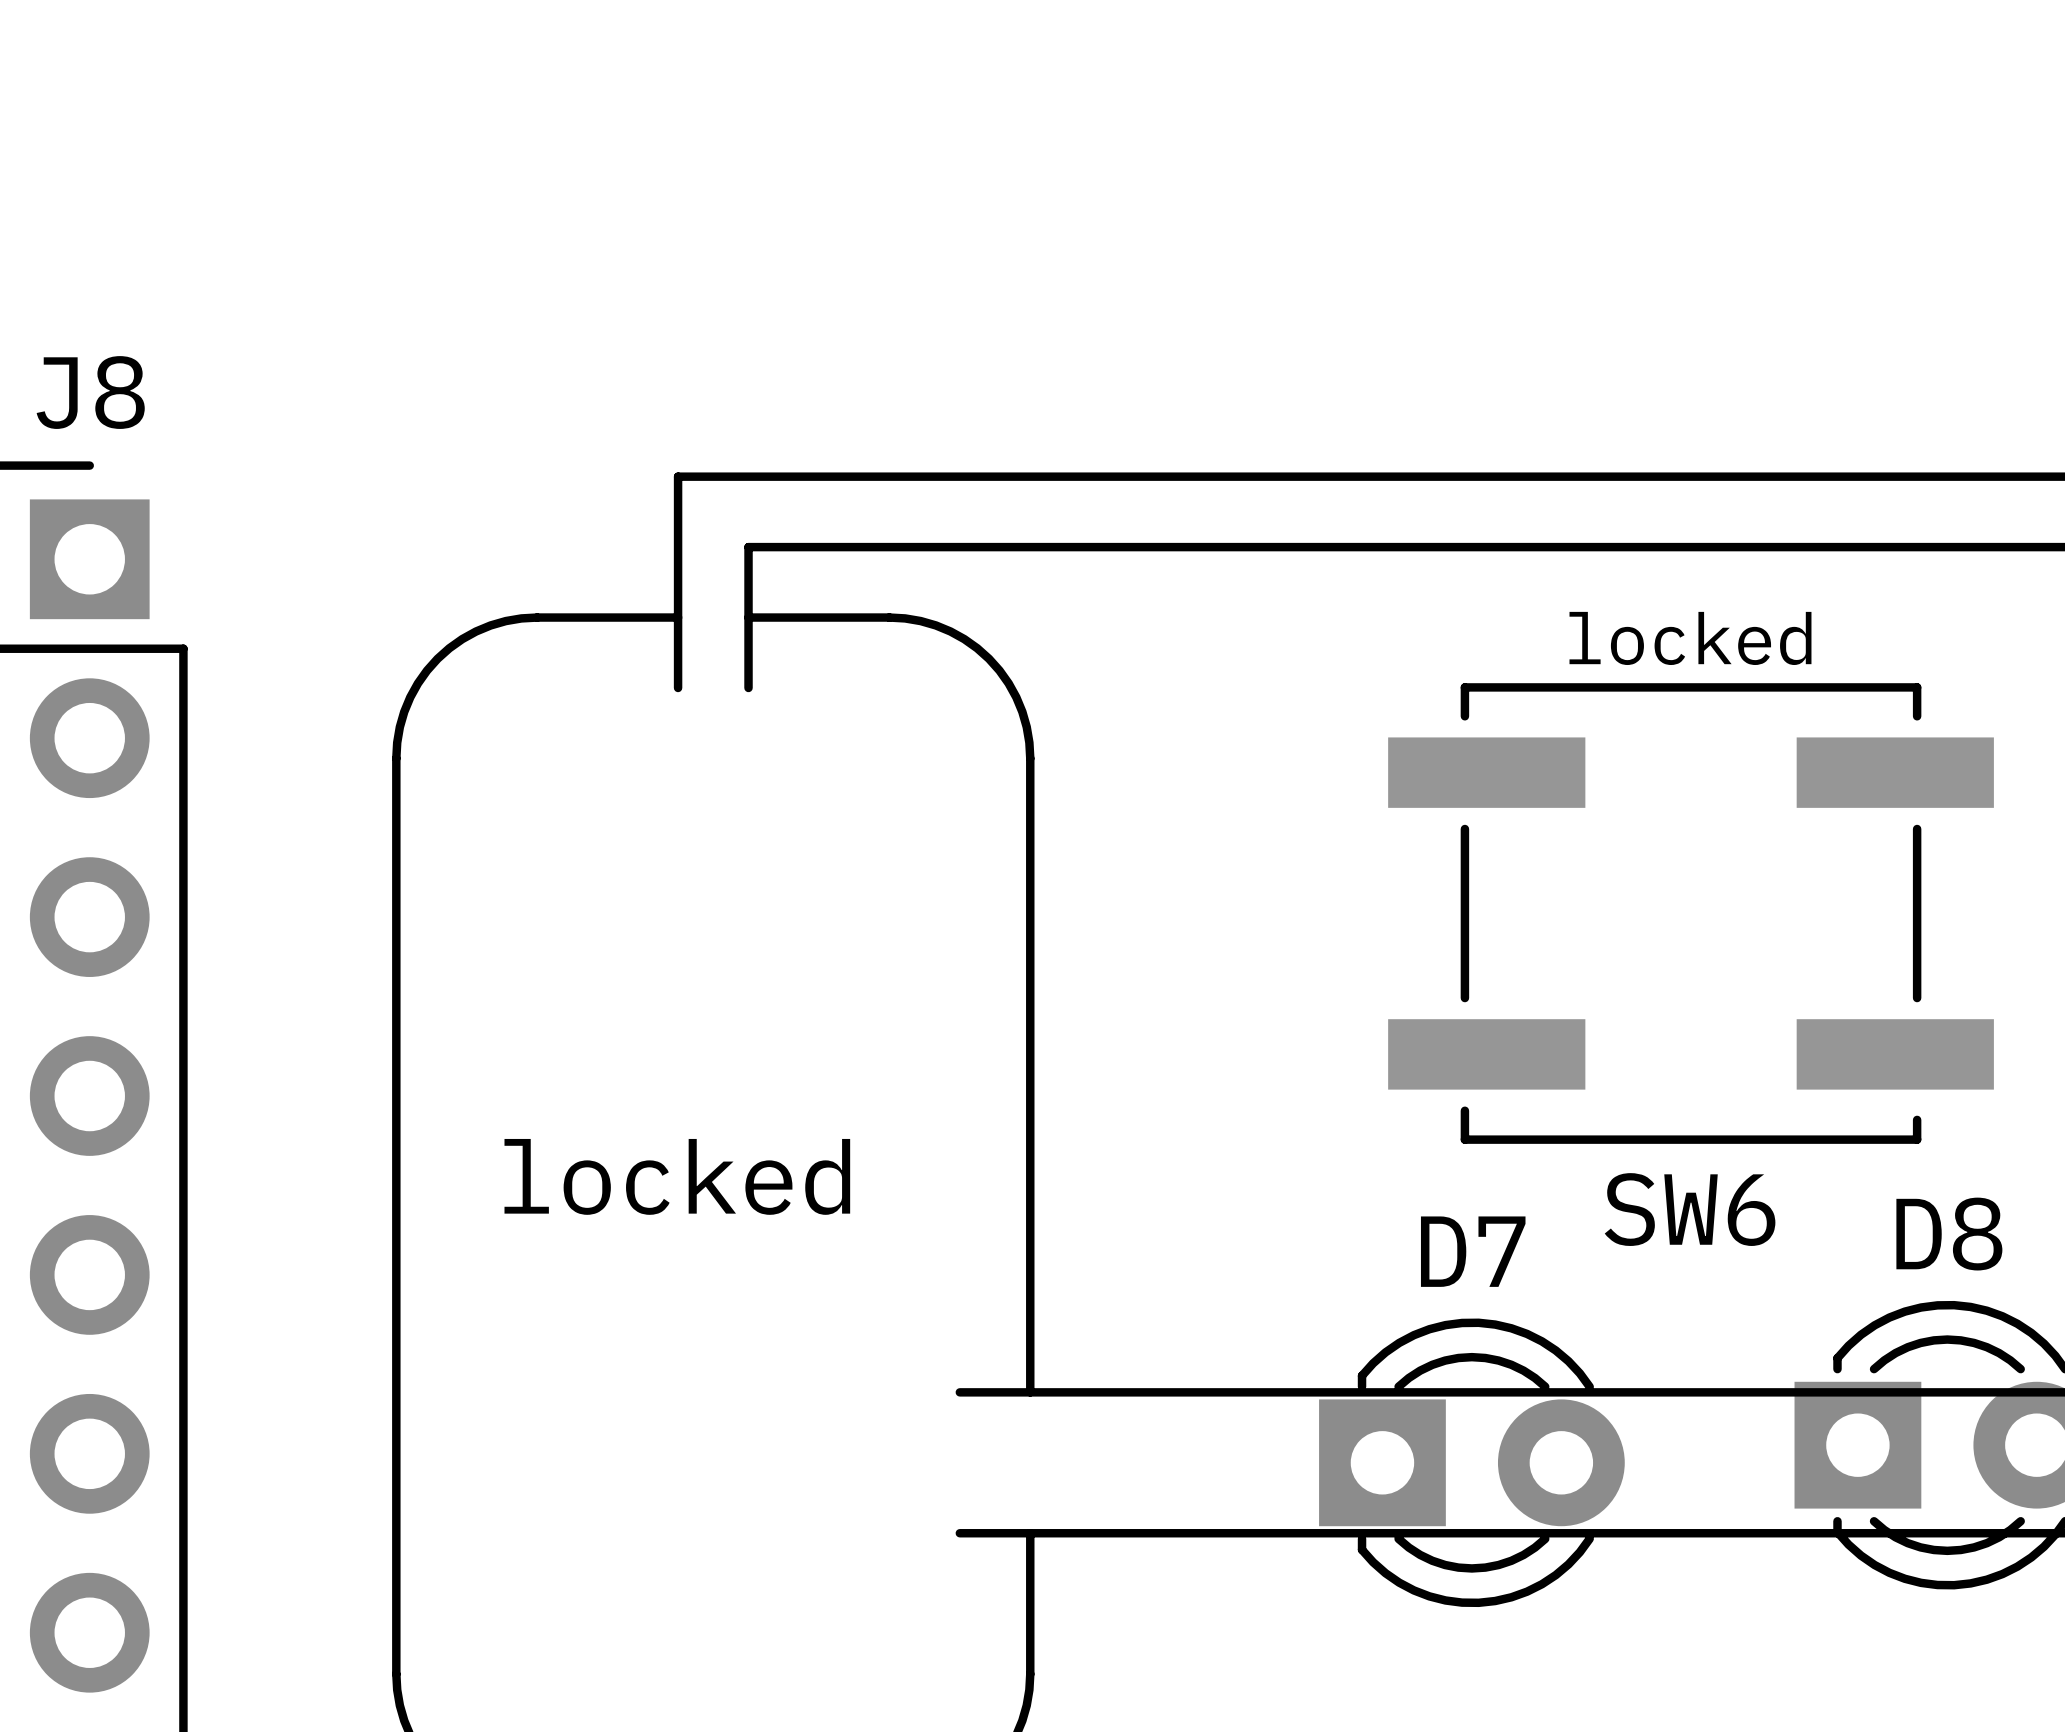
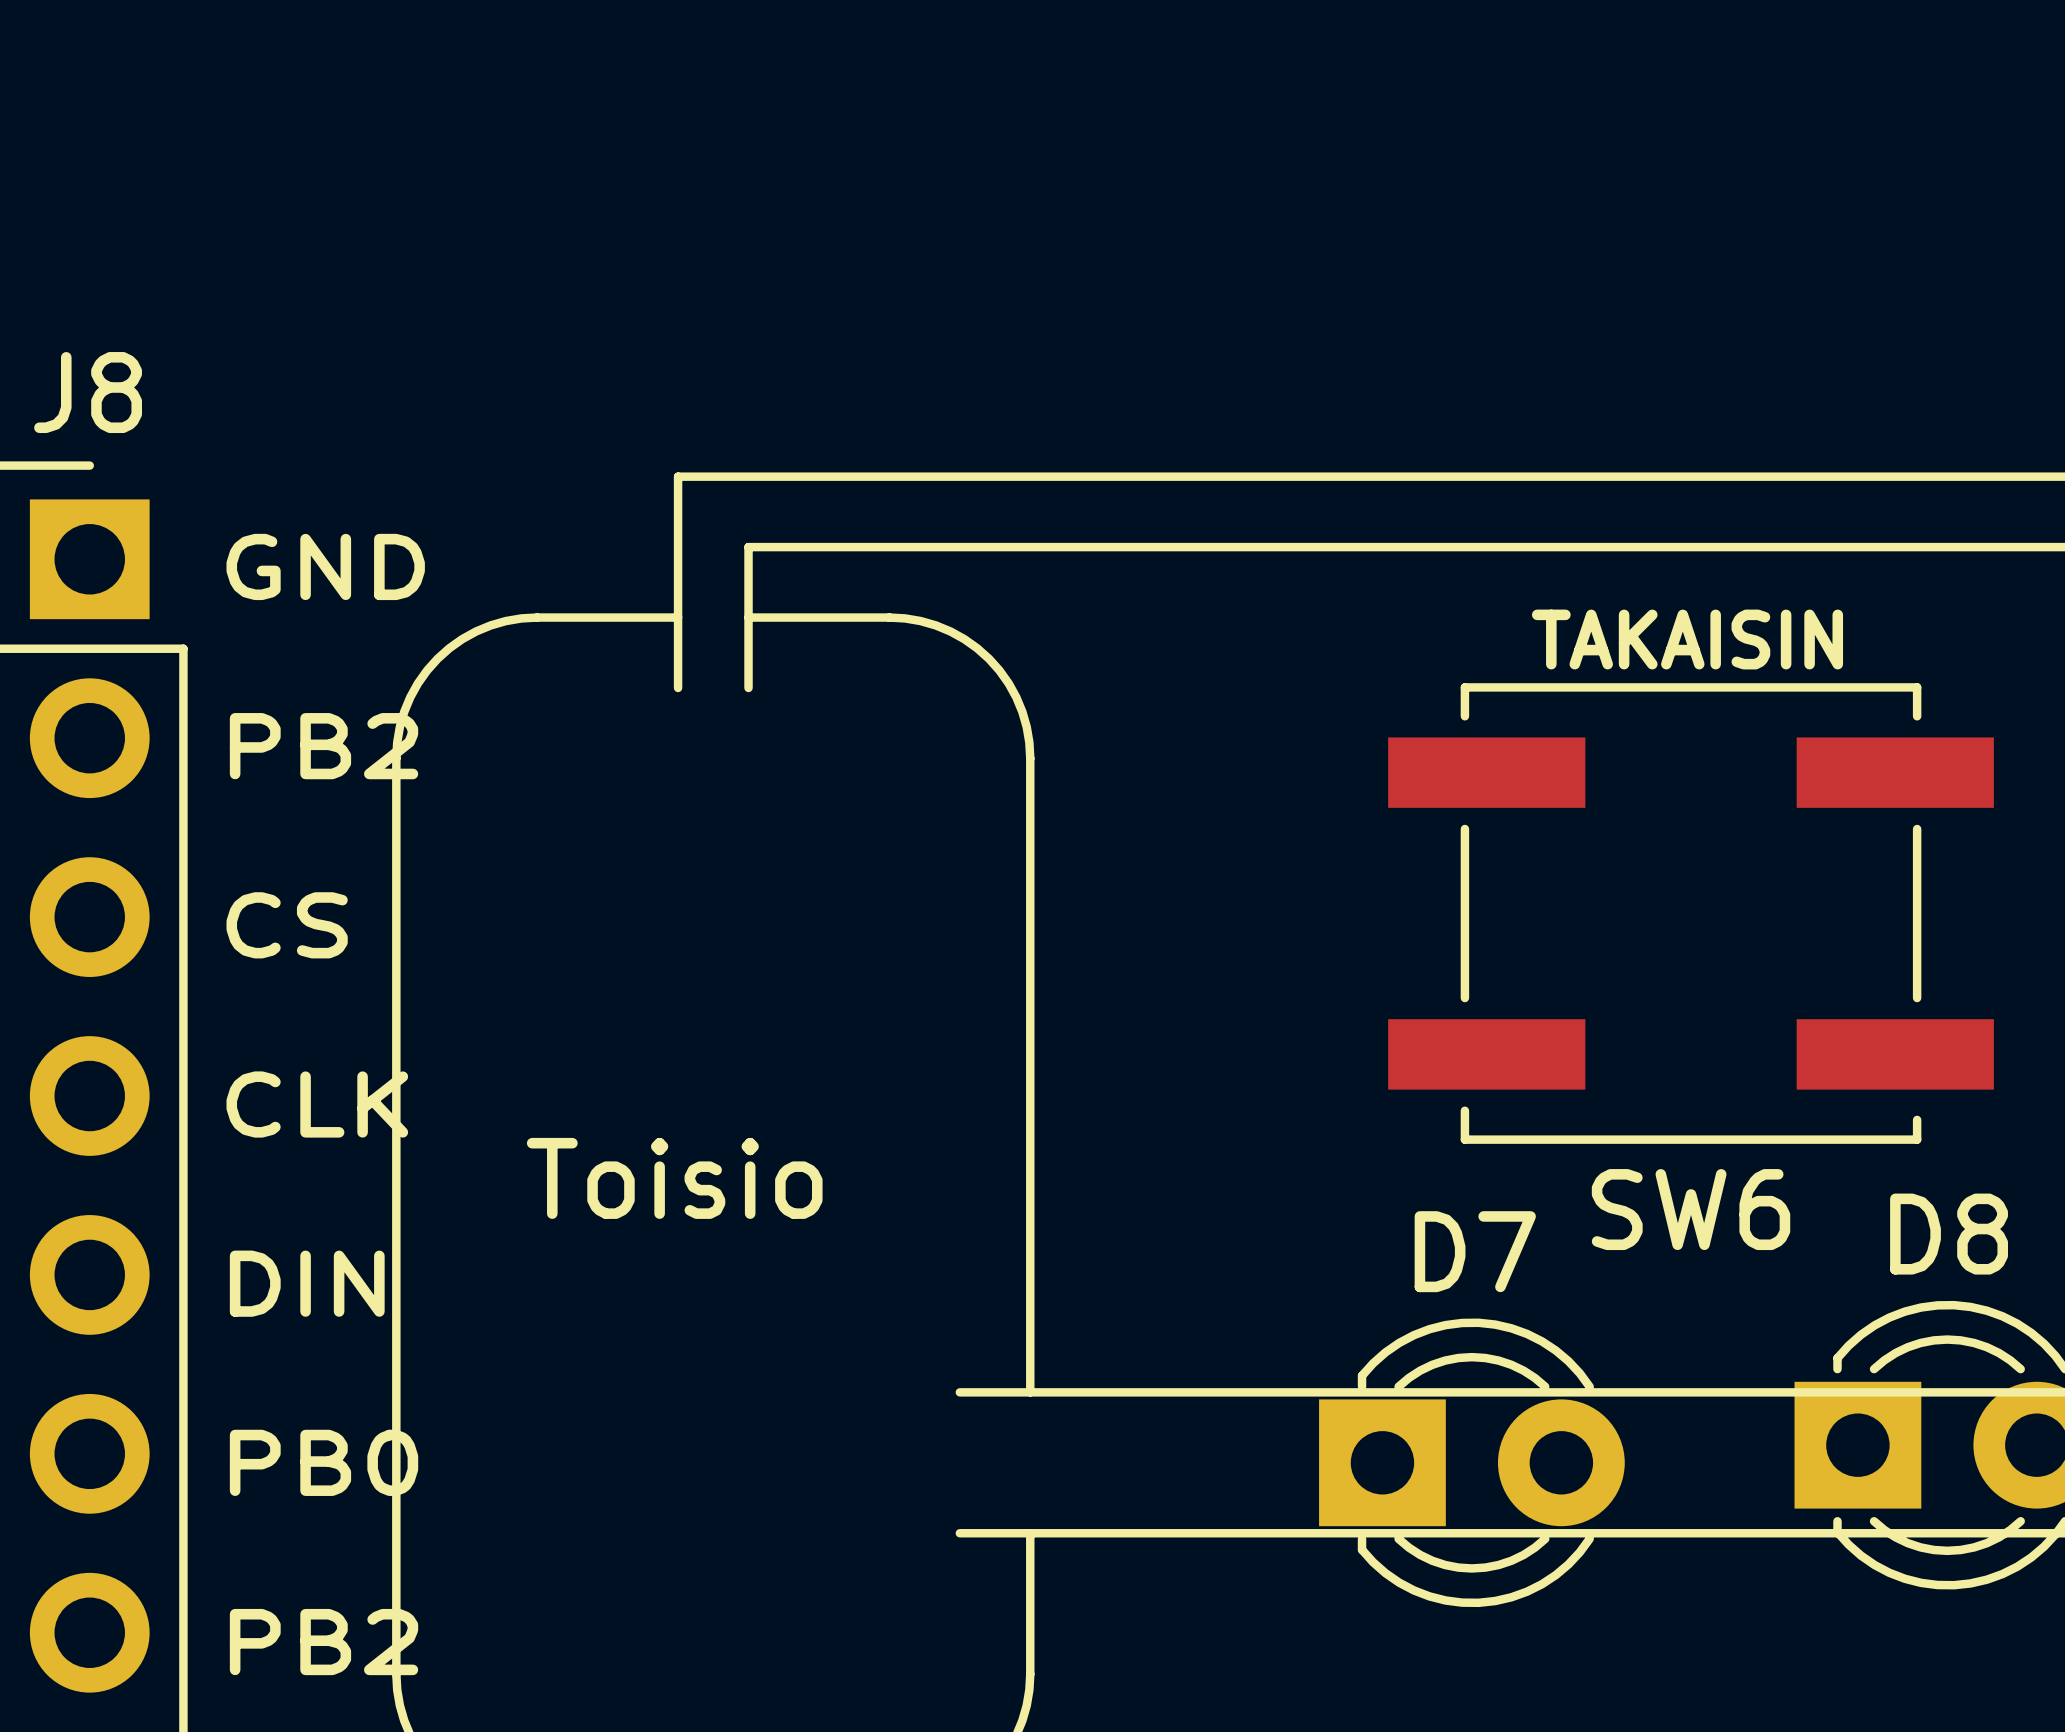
text: none -> GND (325, 566)
text: locked (1690, 638) -> TAKAISIN (1687, 639)
text: none -> PB2 (324, 746)
text: none -> CS (287, 925)
text: none -> CLK (317, 1104)
text: locked (677, 1176) -> Toisio (674, 1178)
text: none -> DIN (307, 1283)
text: none -> PB0 (324, 1462)
text: none -> PB2 (324, 1642)

